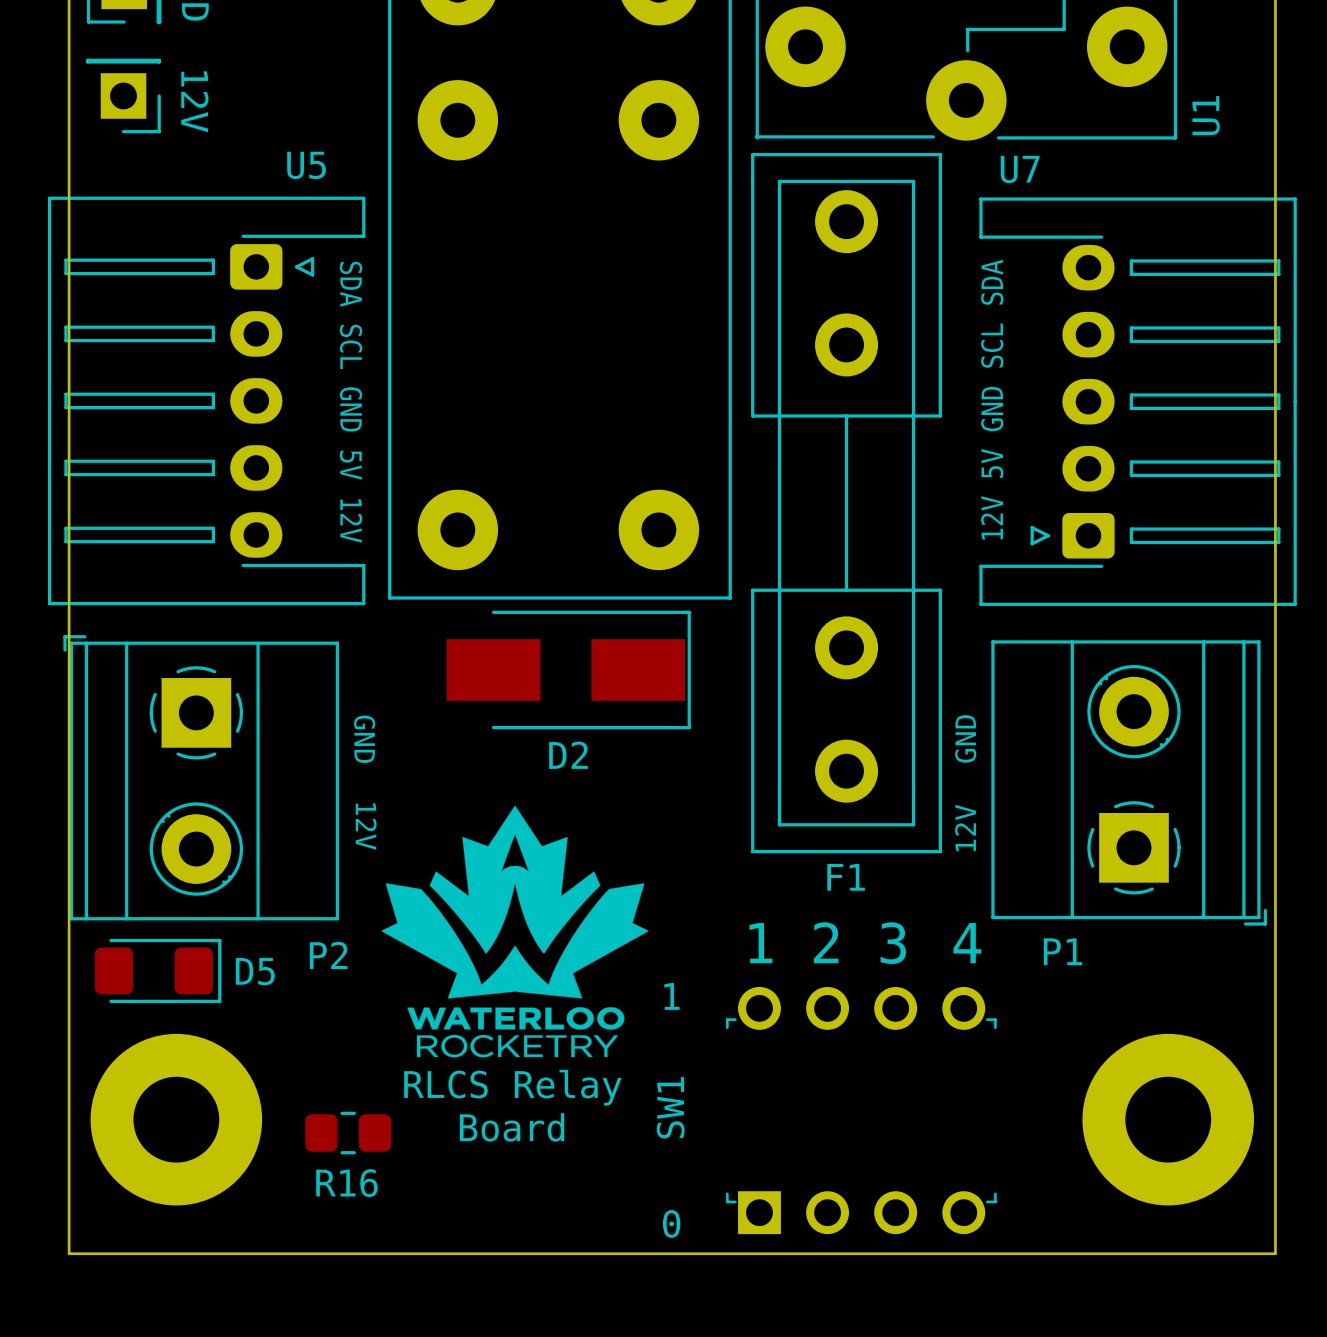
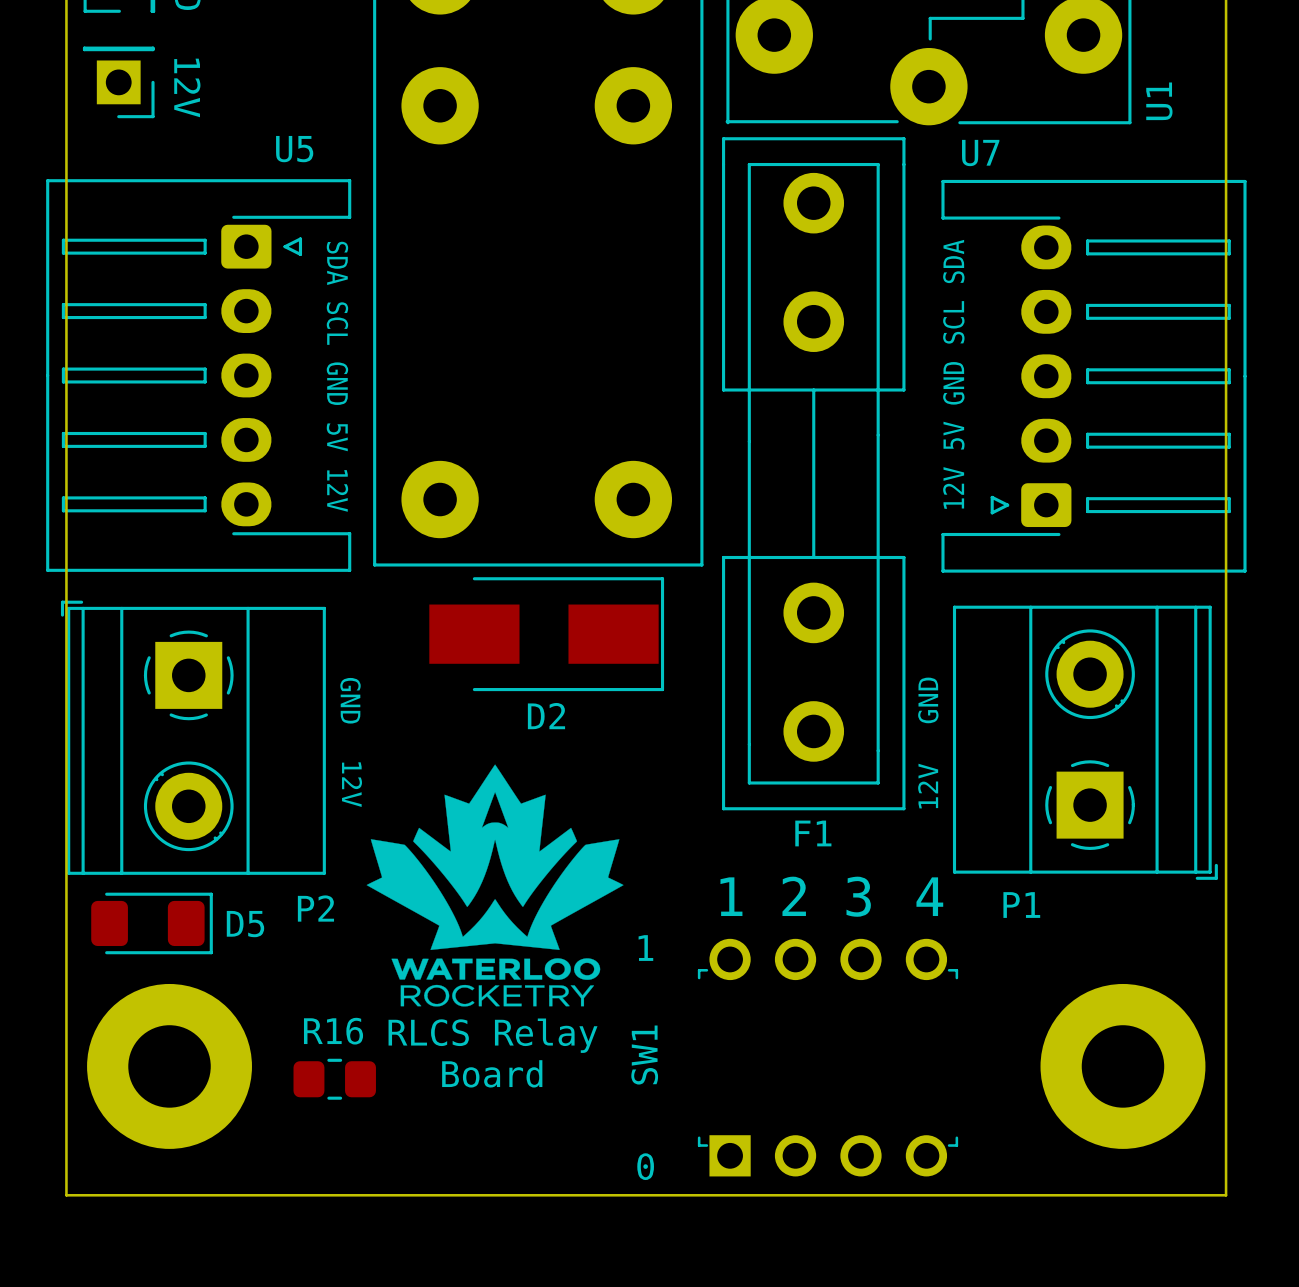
R16 name position: R16 (346, 1183) -> R16 (333, 1031)

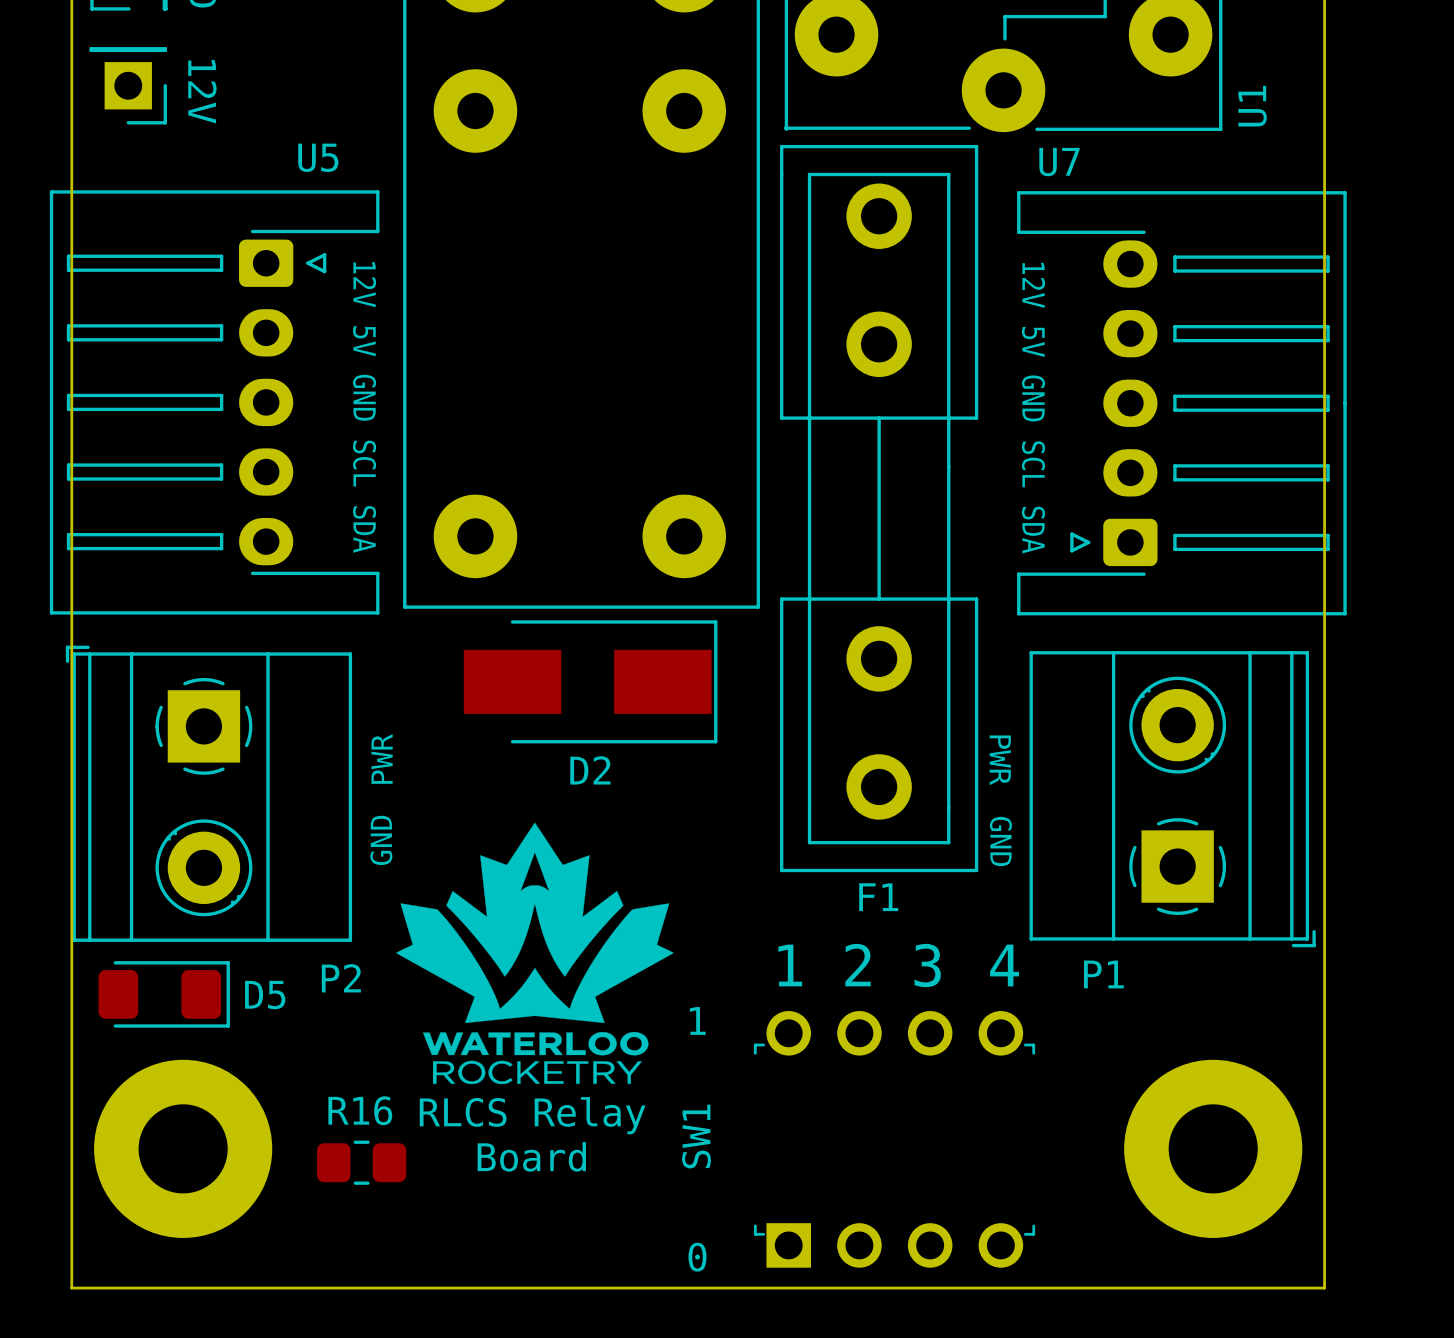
text rotation: 0° (953, 374) -> 180° (1033, 408)
text: SDA SCL GND 5V 12V (337, 376) -> 12V 5V GND SCL SDA (364, 407)
text: GND (350, 700) -> PWR (382, 758)
text: GND (928, 700) -> PWR (1000, 760)
text: 12V (352, 784) -> GND (381, 840)
text: 12V (928, 786) -> GND (1000, 841)

